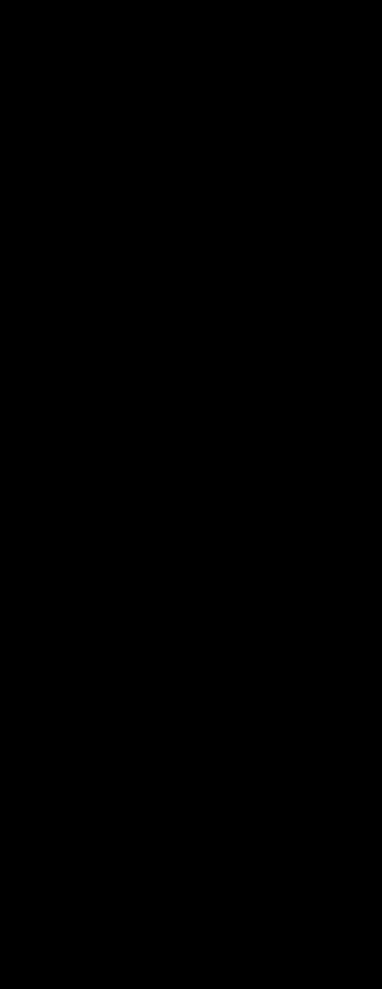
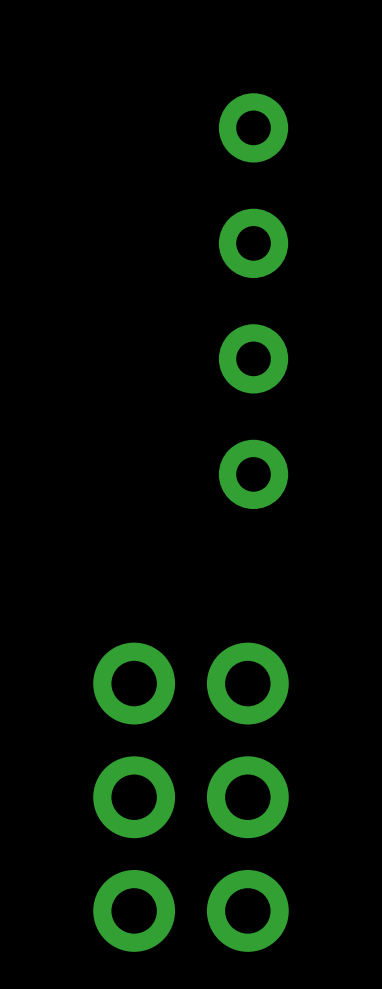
part: none -> (253, 301)
part: none -> (190, 797)

